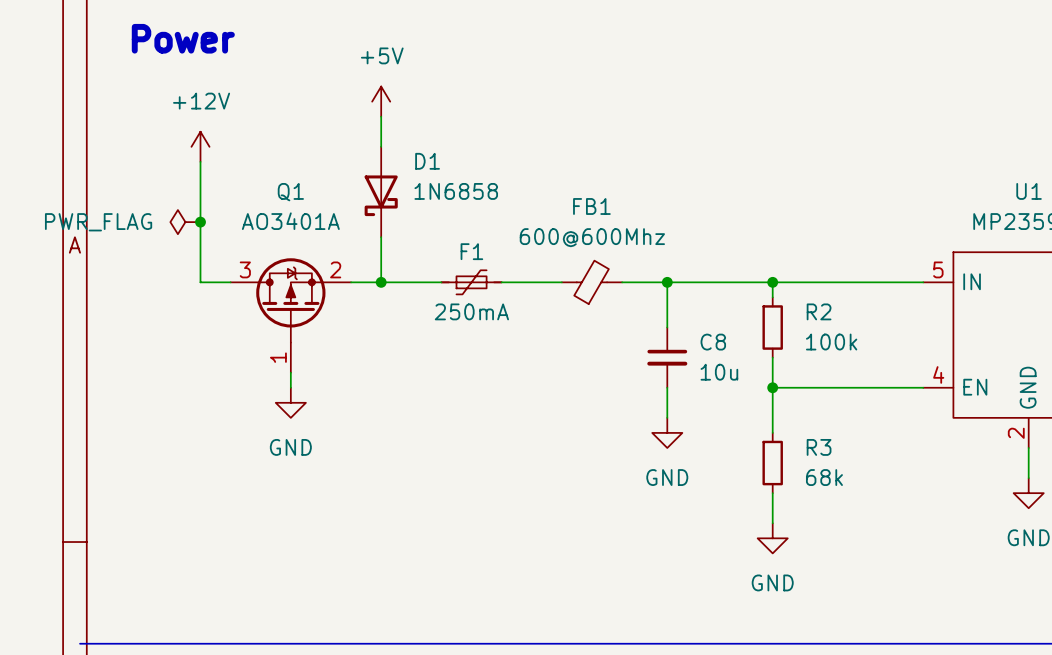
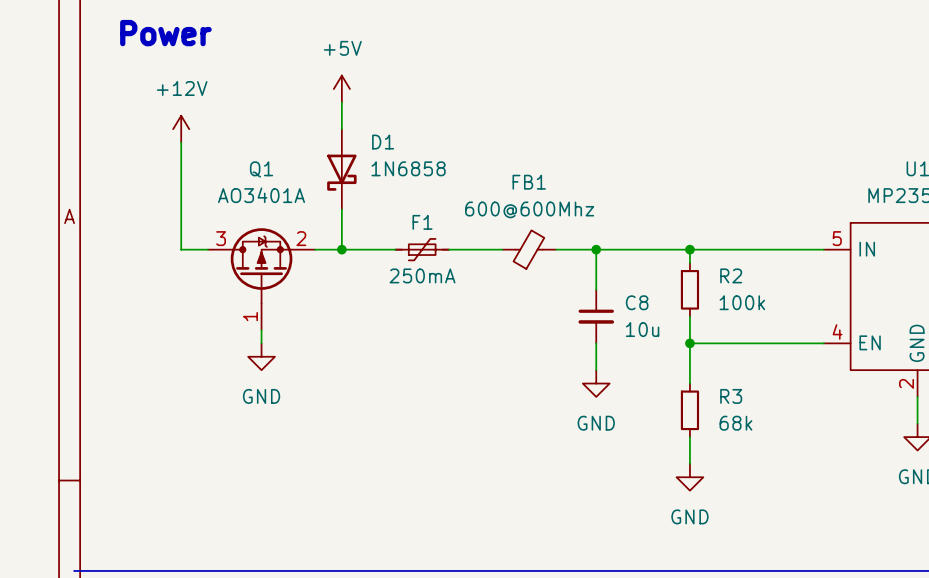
power symbol: PWR_FLAG (185, 222) -> none
junction: (200, 222) -> none

